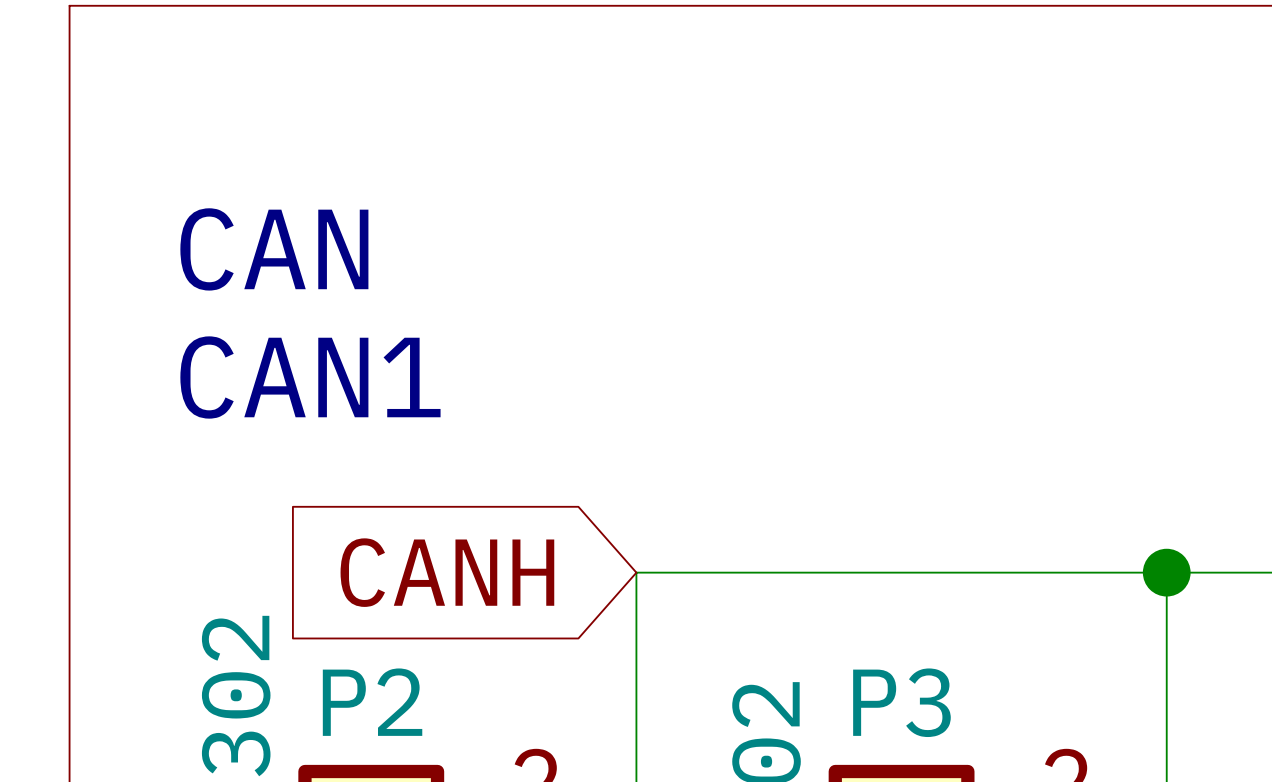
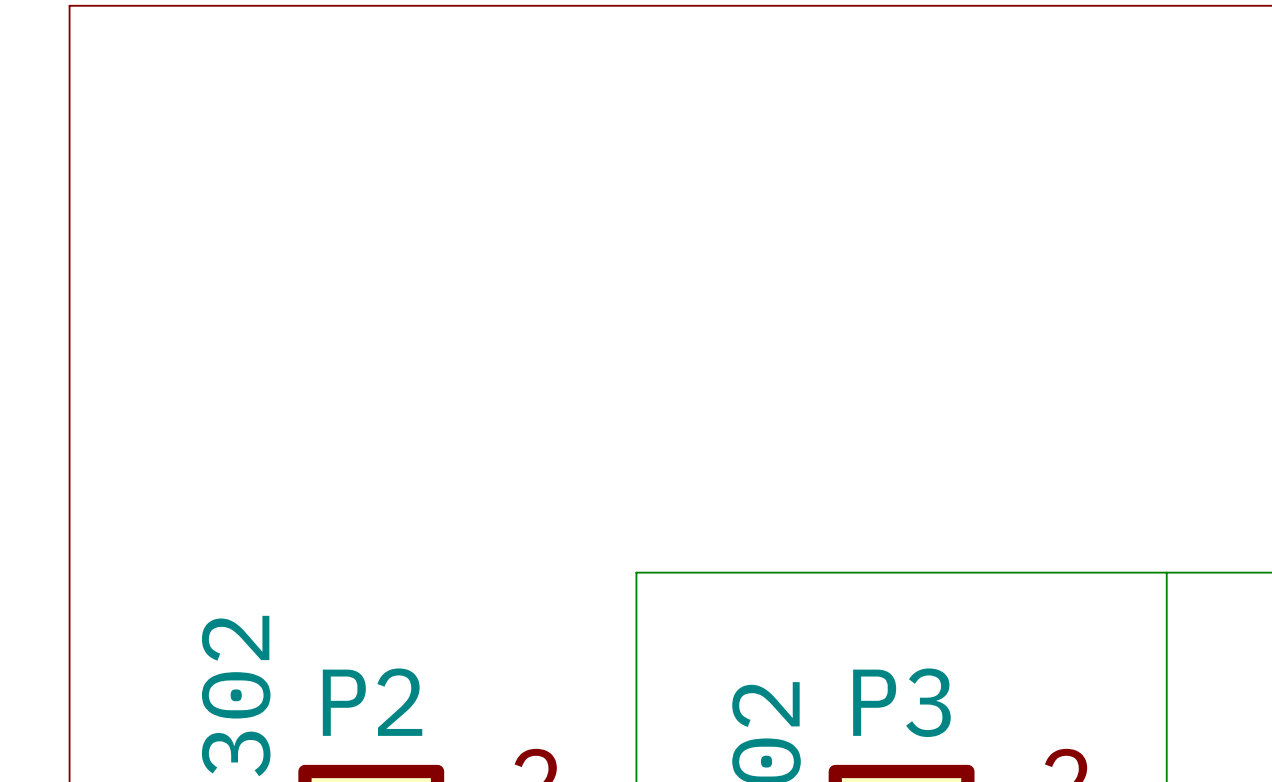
text: CAN (274, 249) -> none
text: CAN1 (310, 377) -> none
global label: CANH (447, 572) -> none
junction: (1166, 572) -> none

